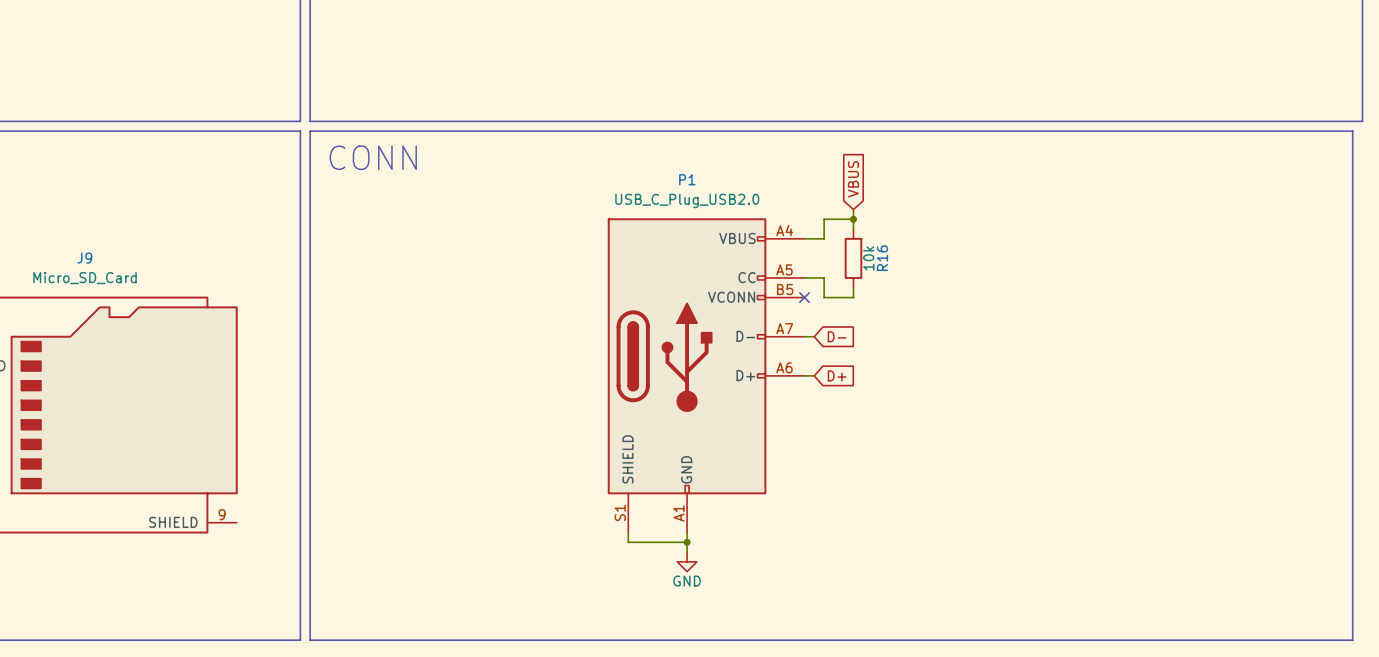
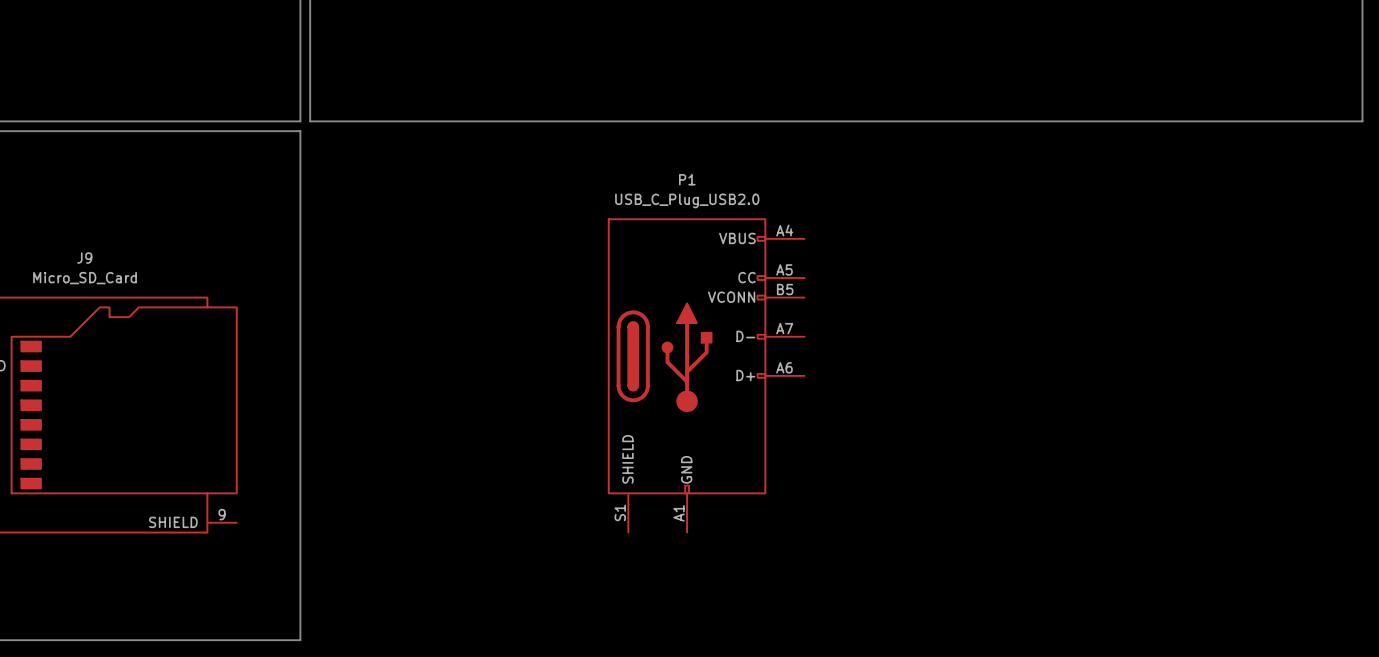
line: (310, 131) (1352, 131) (1352, 640) (310, 640) (310, 131) -> none
text: CONN (373, 157) -> none
global label: VBUS (853, 179) -> none
wire: (853, 209) (853, 229) -> none
wire: (853, 219) (824, 219) (824, 238) (804, 238) -> none
junction: (853, 219) -> none
R16: 10k (853, 258) -> none
wire: (804, 278) (824, 278) (824, 297) (853, 297) (853, 287) -> none
no-connect mark: (804, 297) -> none
wire: (804, 336) (814, 336) -> none
global label: D- (837, 336) -> none
wire: (804, 375) (814, 375) -> none
global label: D+ (837, 375) -> none
wire: (628, 532) (628, 542) (687, 542) -> none
wire: (687, 532) (687, 552) -> none
junction: (687, 542) -> none
power symbol: GND (687, 561) -> none

